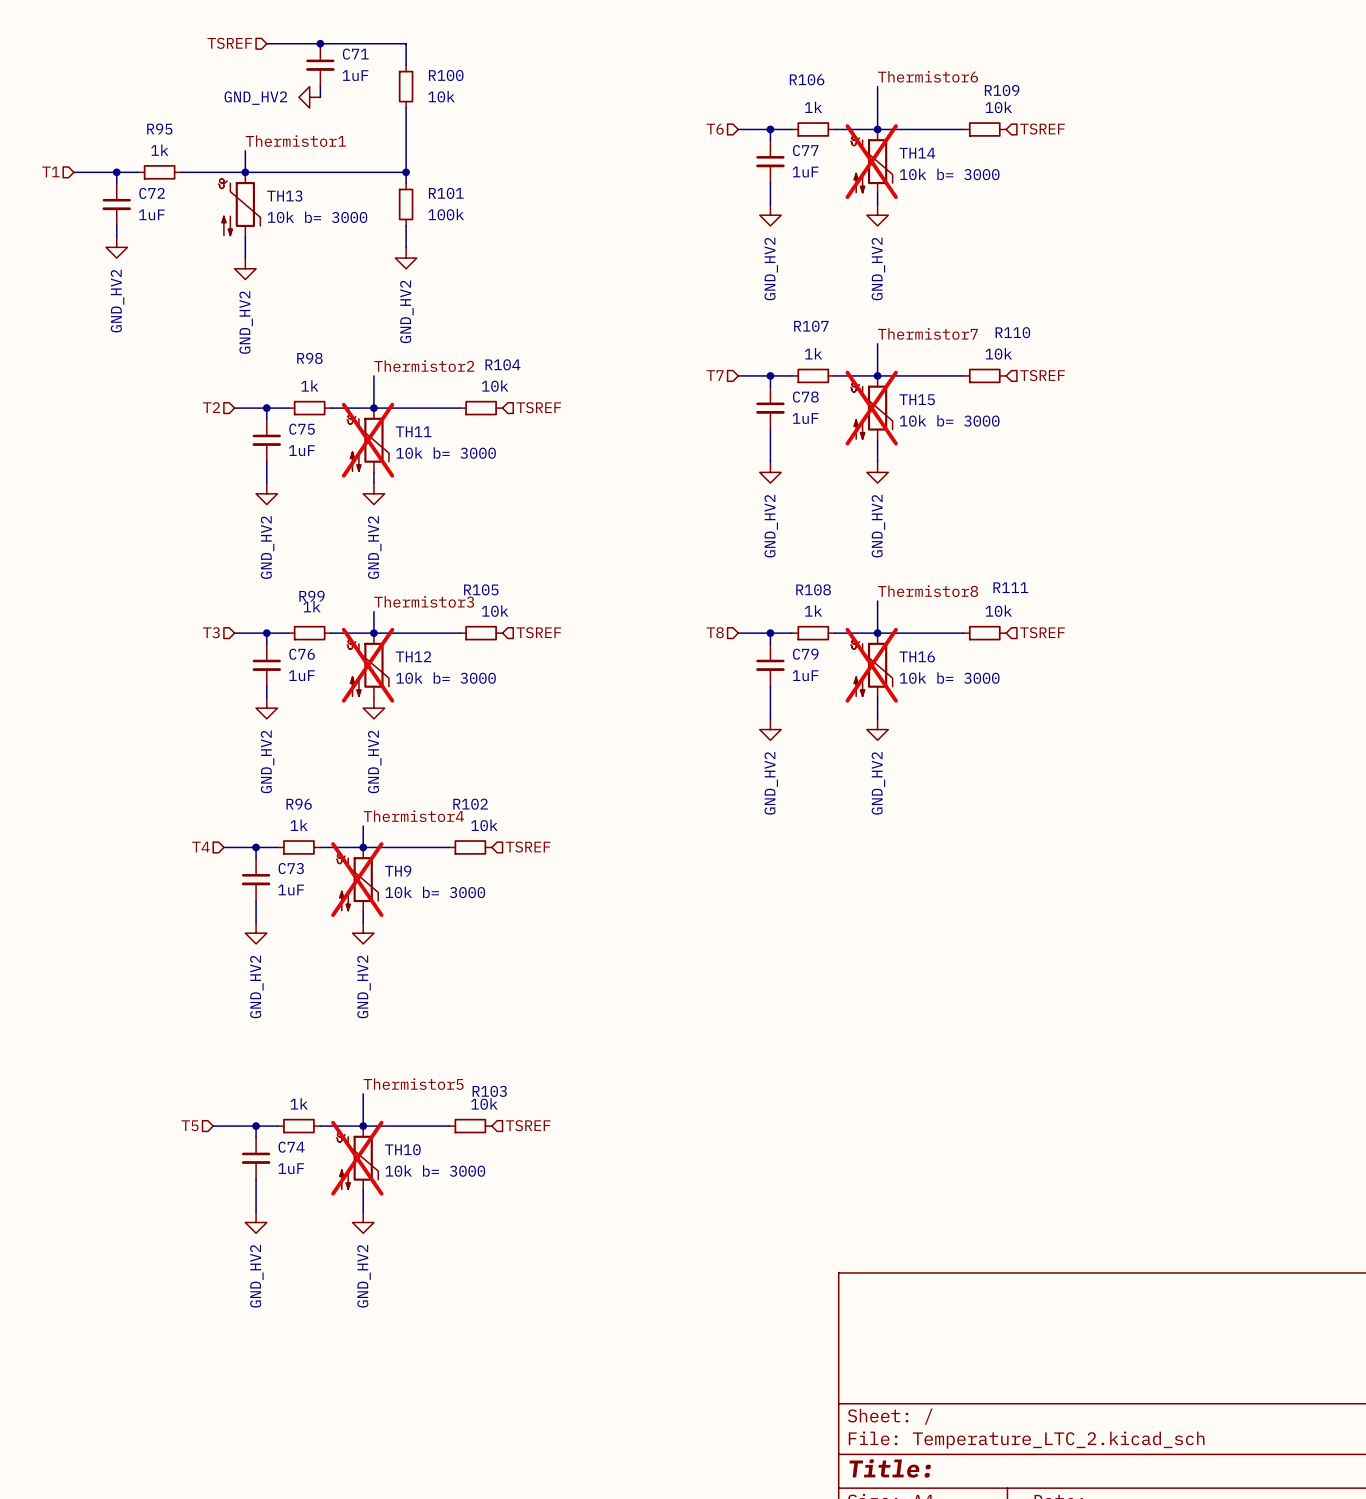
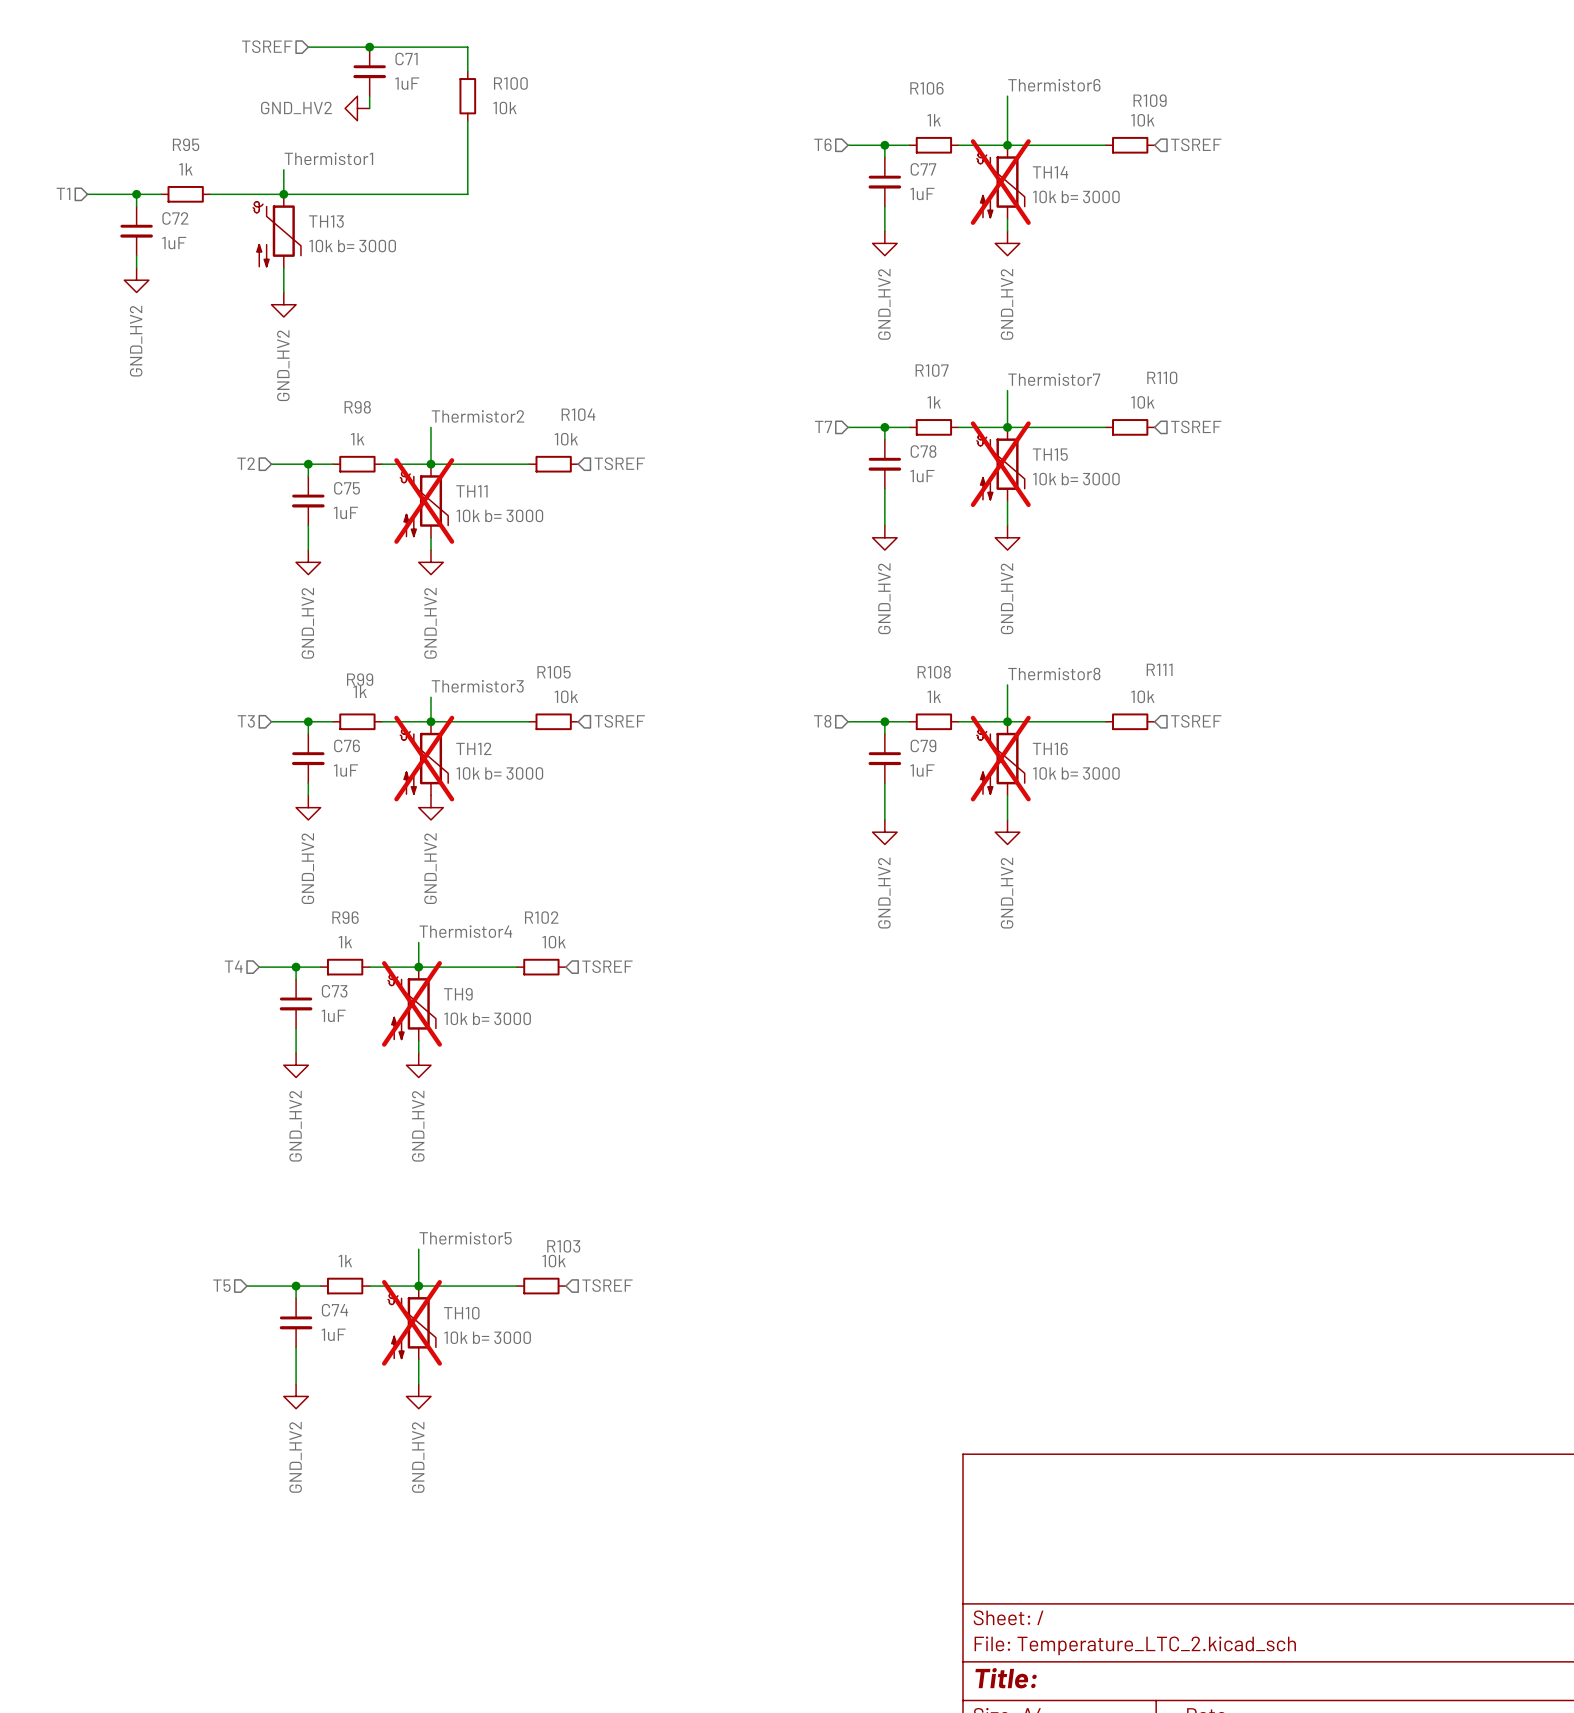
wire: (406, 172) (406, 183) -> none
junction: (406, 172) -> none
R101: 100k (406, 204) -> none
wire: (406, 225) (406, 247) -> none
power symbol: GND_HV2 (406, 258) -> none

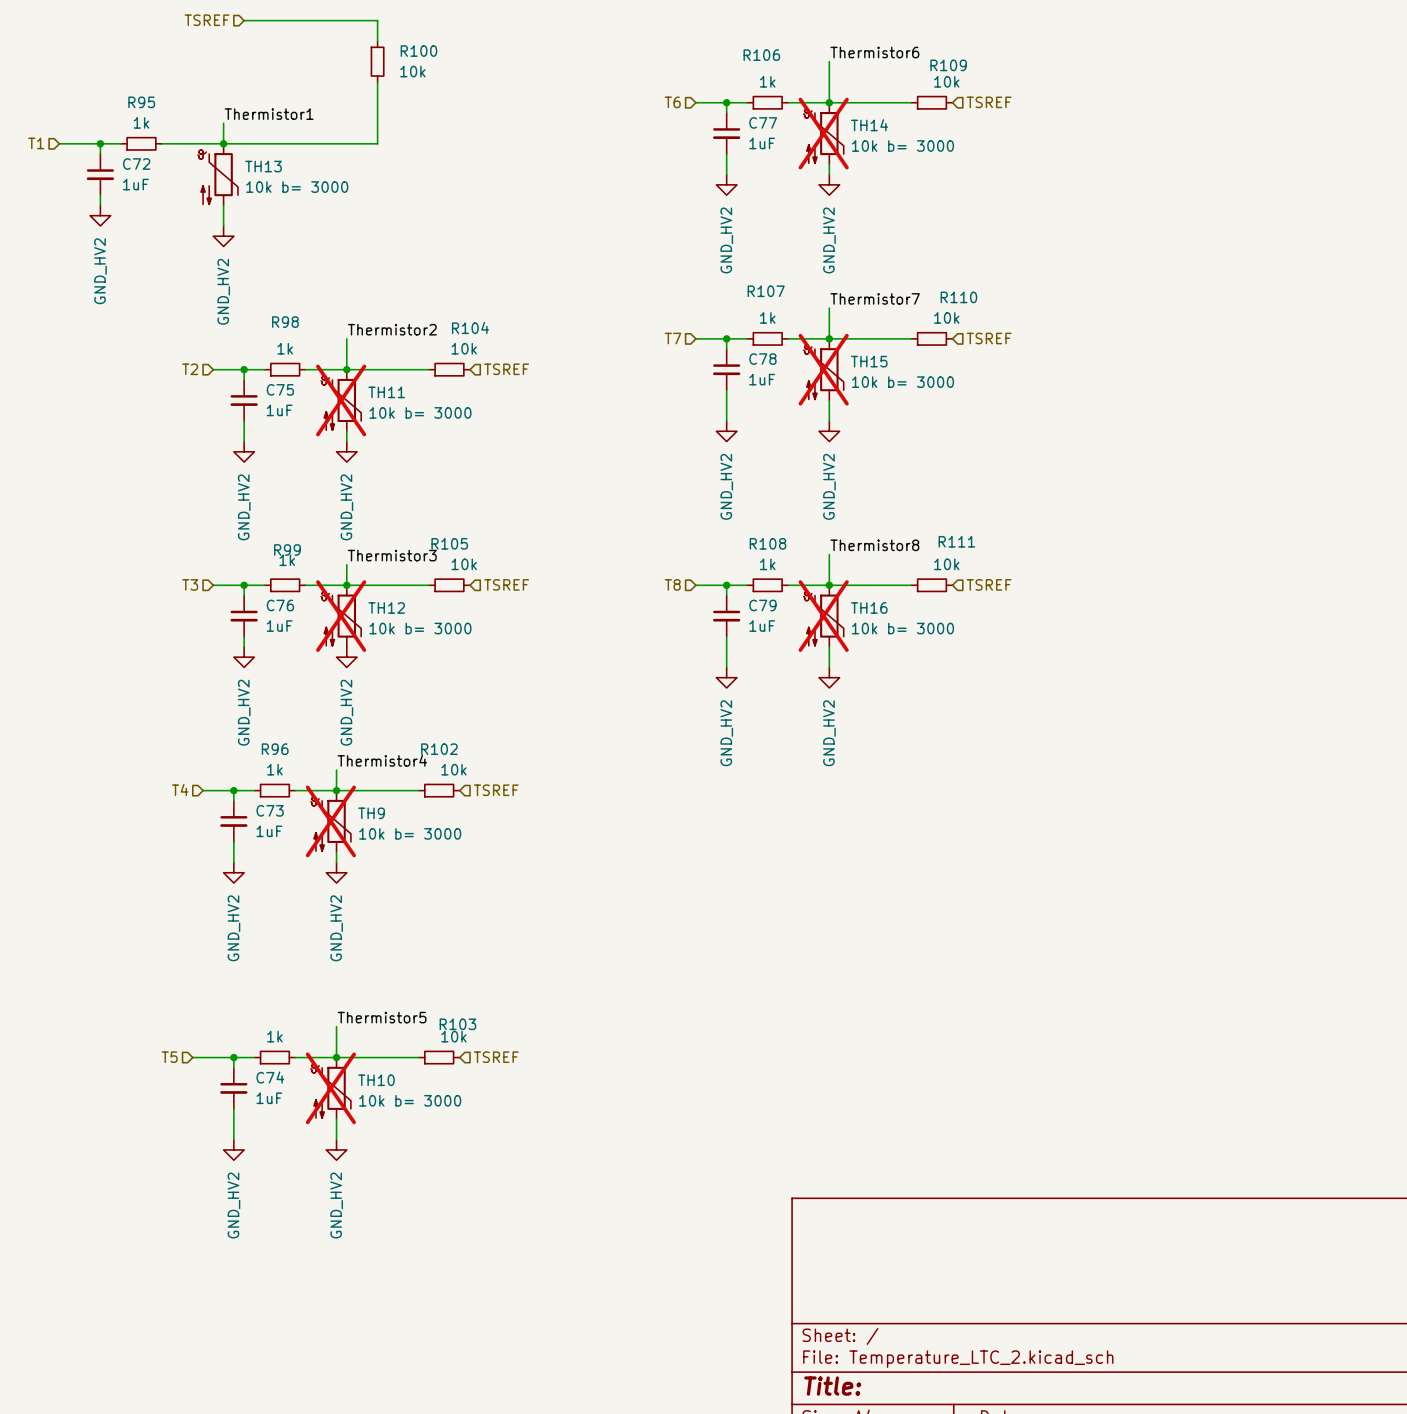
junction: (369, 47) -> none
C71: 1uF (369, 71) -> none
wire: (369, 96) (369, 108) -> none
power symbol: GND_HV2 (357, 108) -> none

